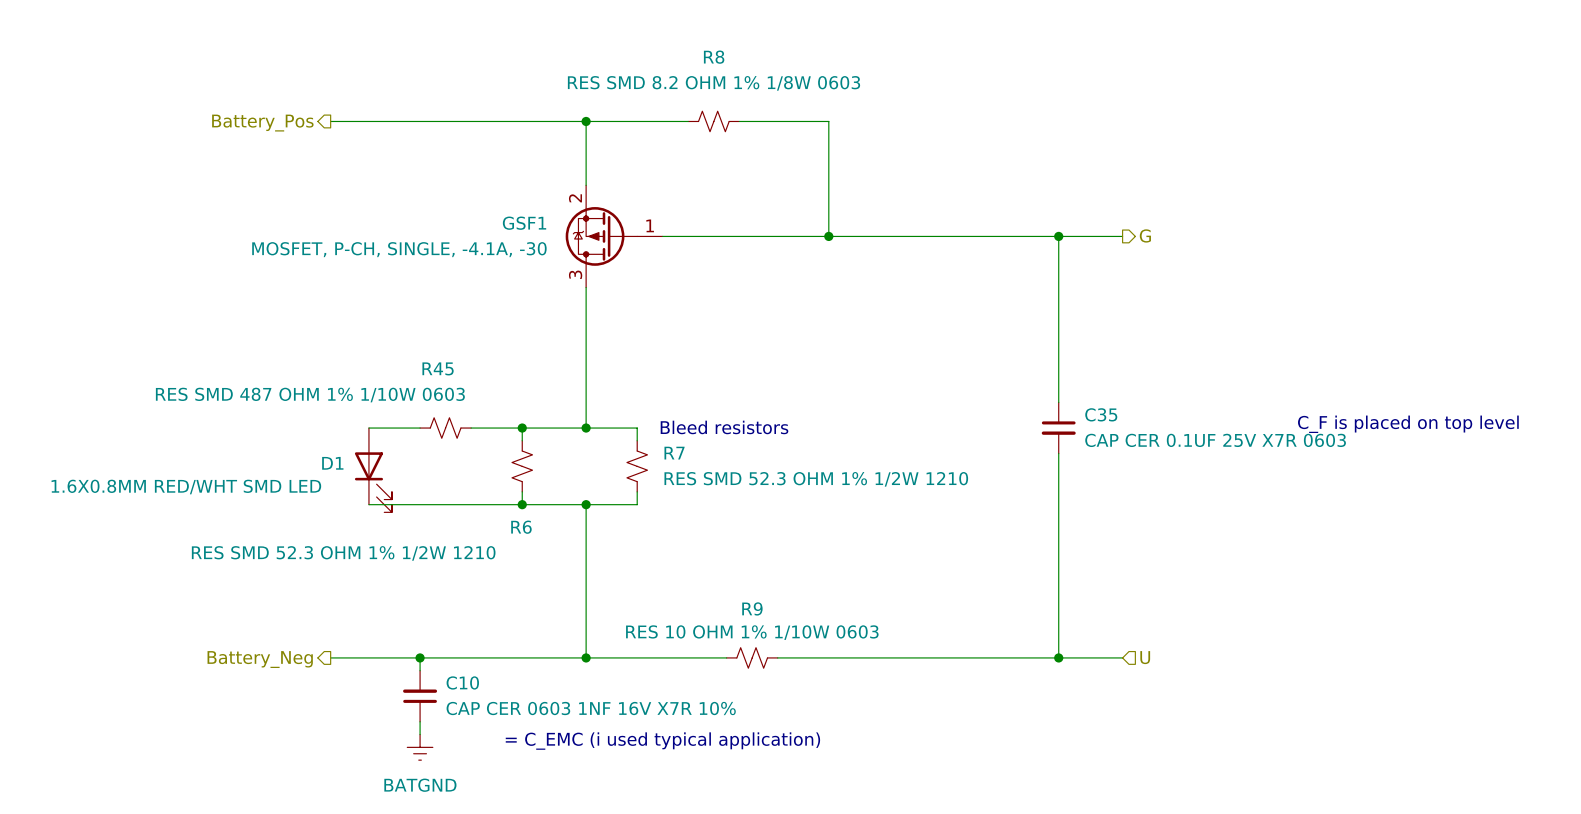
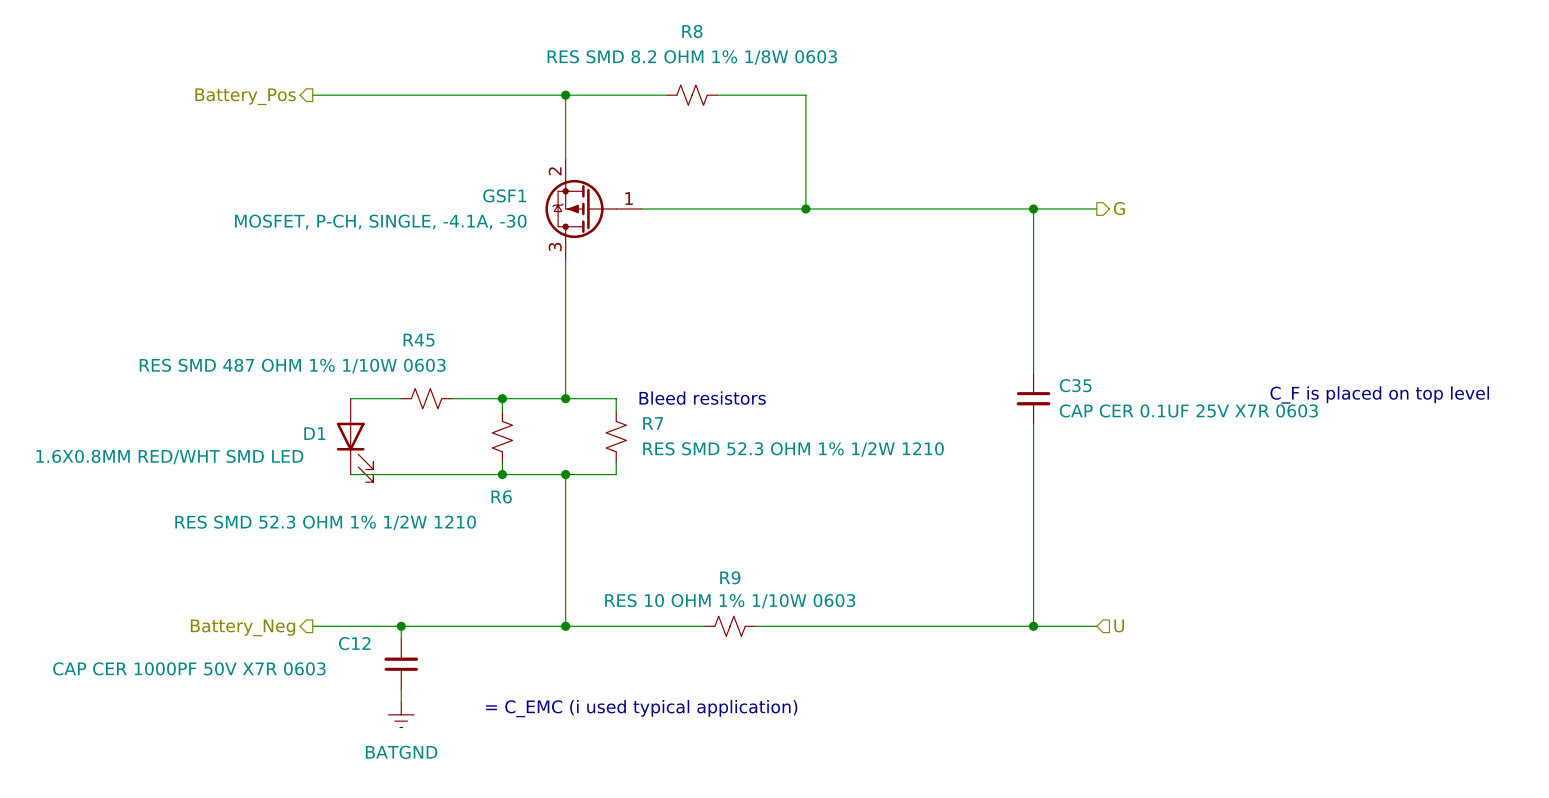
C10 name: C10 (462, 682) -> C12 (354, 643)
C10 value: CAP CER 0603 1NF 16V X7R 10% (591, 708) -> CAP CER 1000PF 50V X7R 0603 (189, 668)

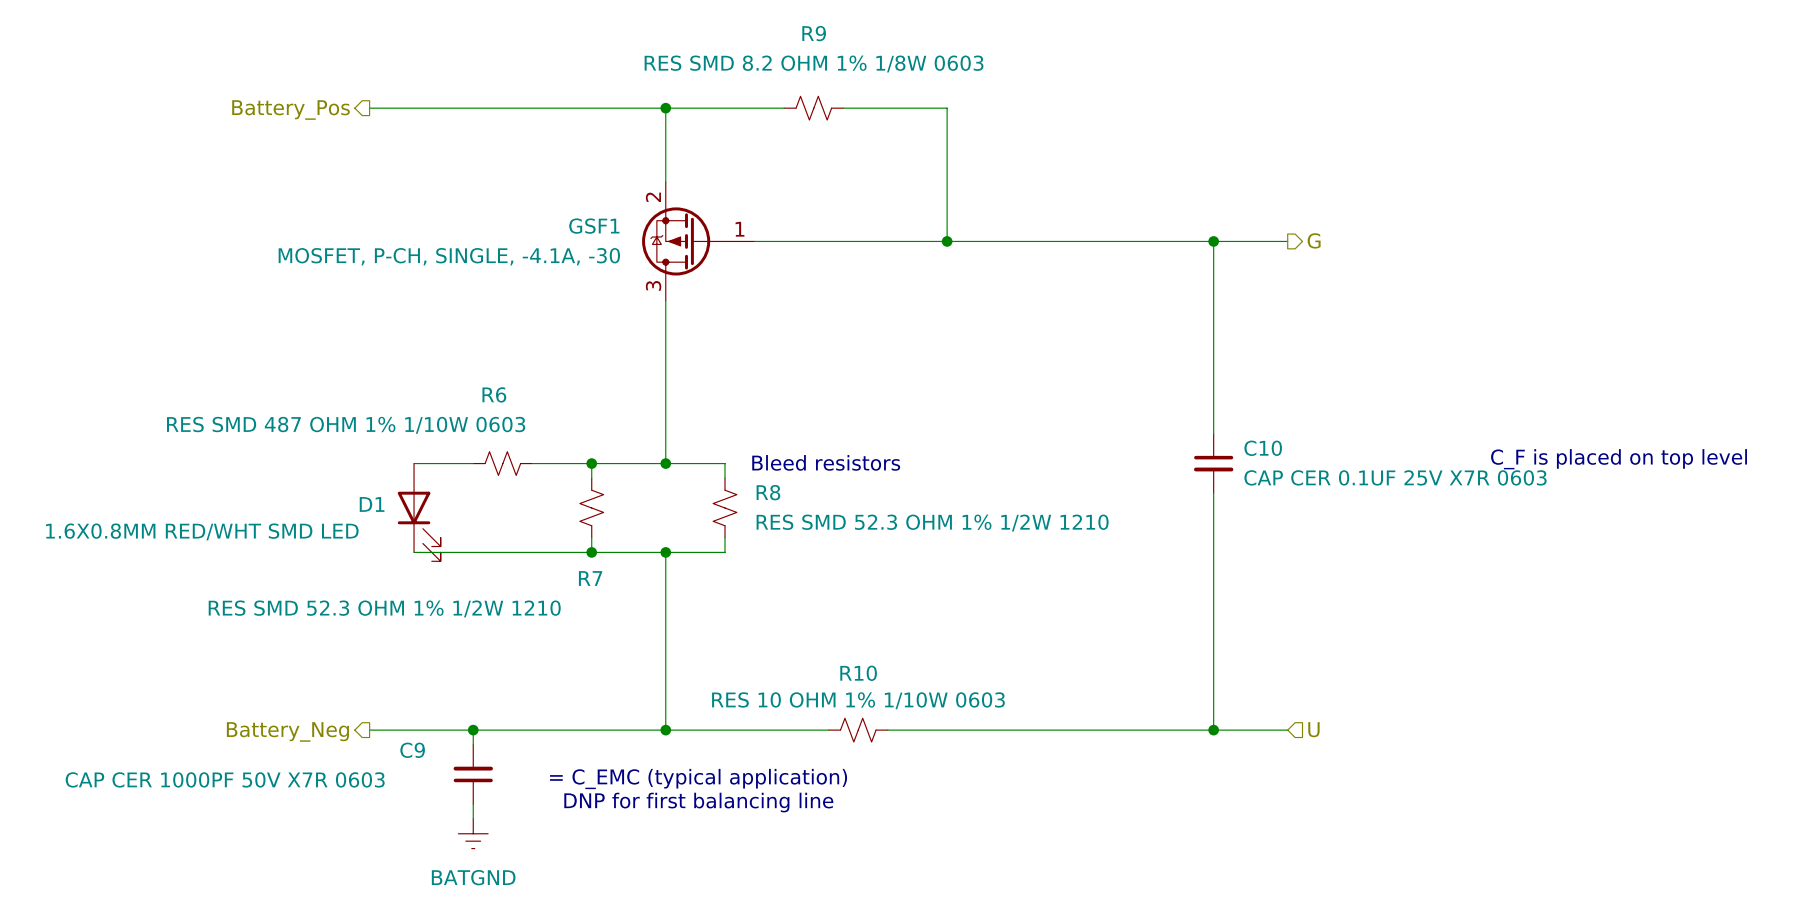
R8 name: R8 (692, 31) -> R9 (814, 33)
R45 name: R45 (419, 340) -> R6 (494, 394)
C35 name: C35 (1075, 385) -> C10 (1263, 448)
R7 name: R7 (653, 423) -> R8 (768, 492)
R6 name: R6 (501, 496) -> R7 (590, 578)
R9 name: R9 (730, 577) -> R10 (858, 673)
C12 name: C12 (354, 643) -> C9 (412, 750)
text: none -> = C_EMC (typical application) (698, 779)
text: none -> DNP for first balancing line (698, 802)
text: = C_EMC (i used typical application) (641, 708) -> none

